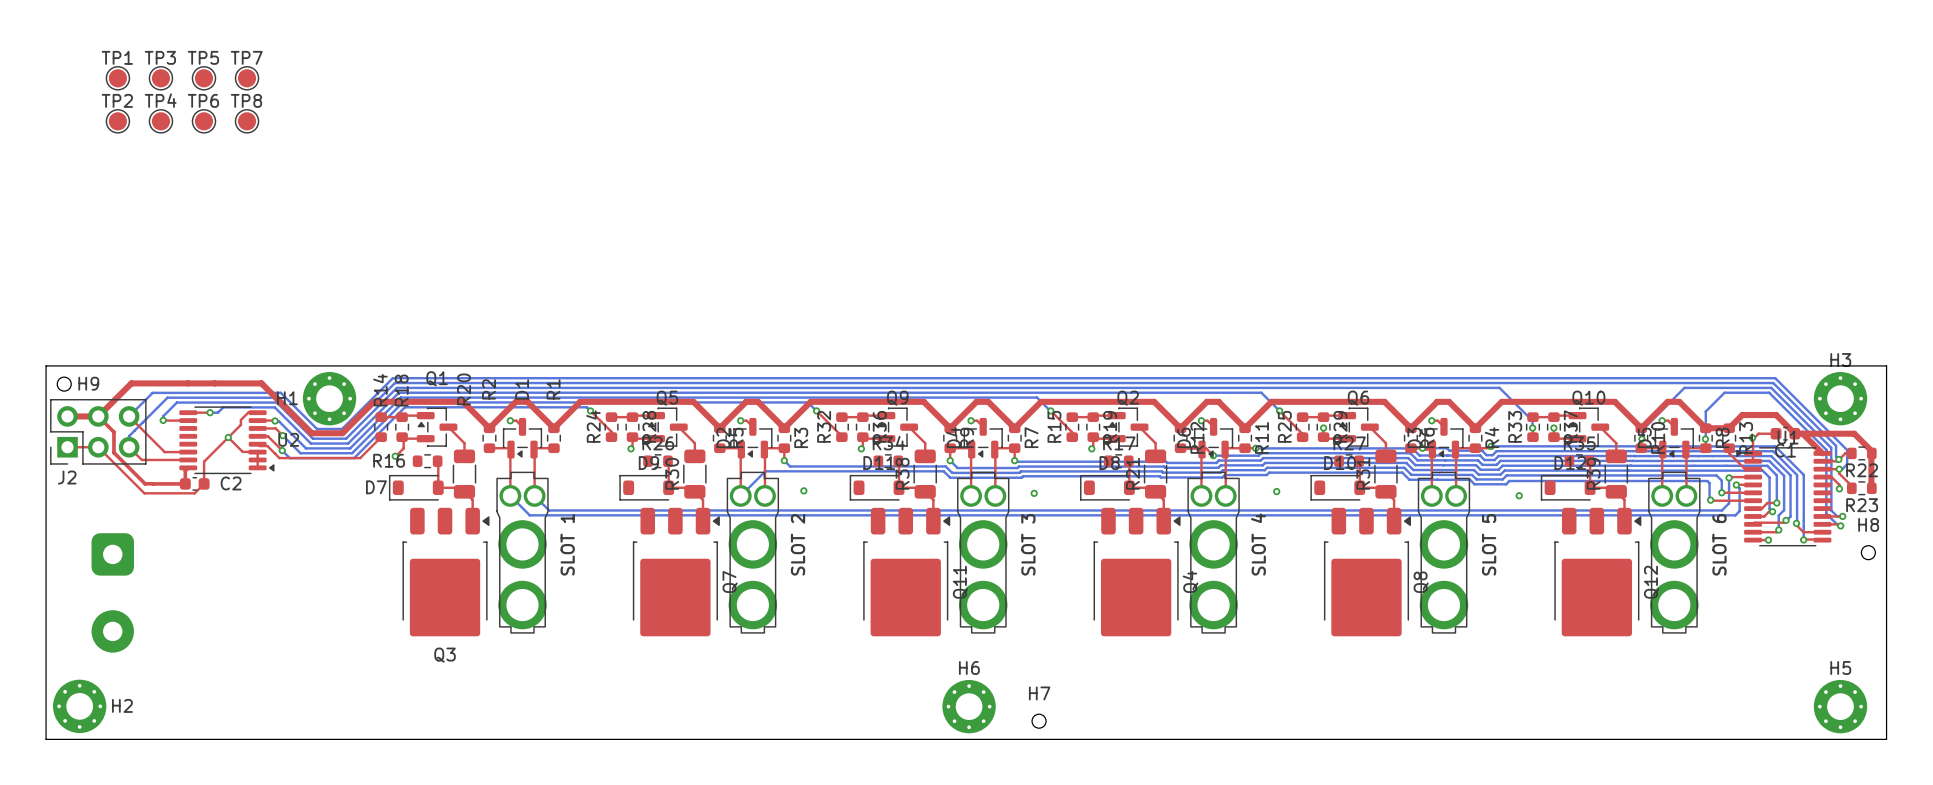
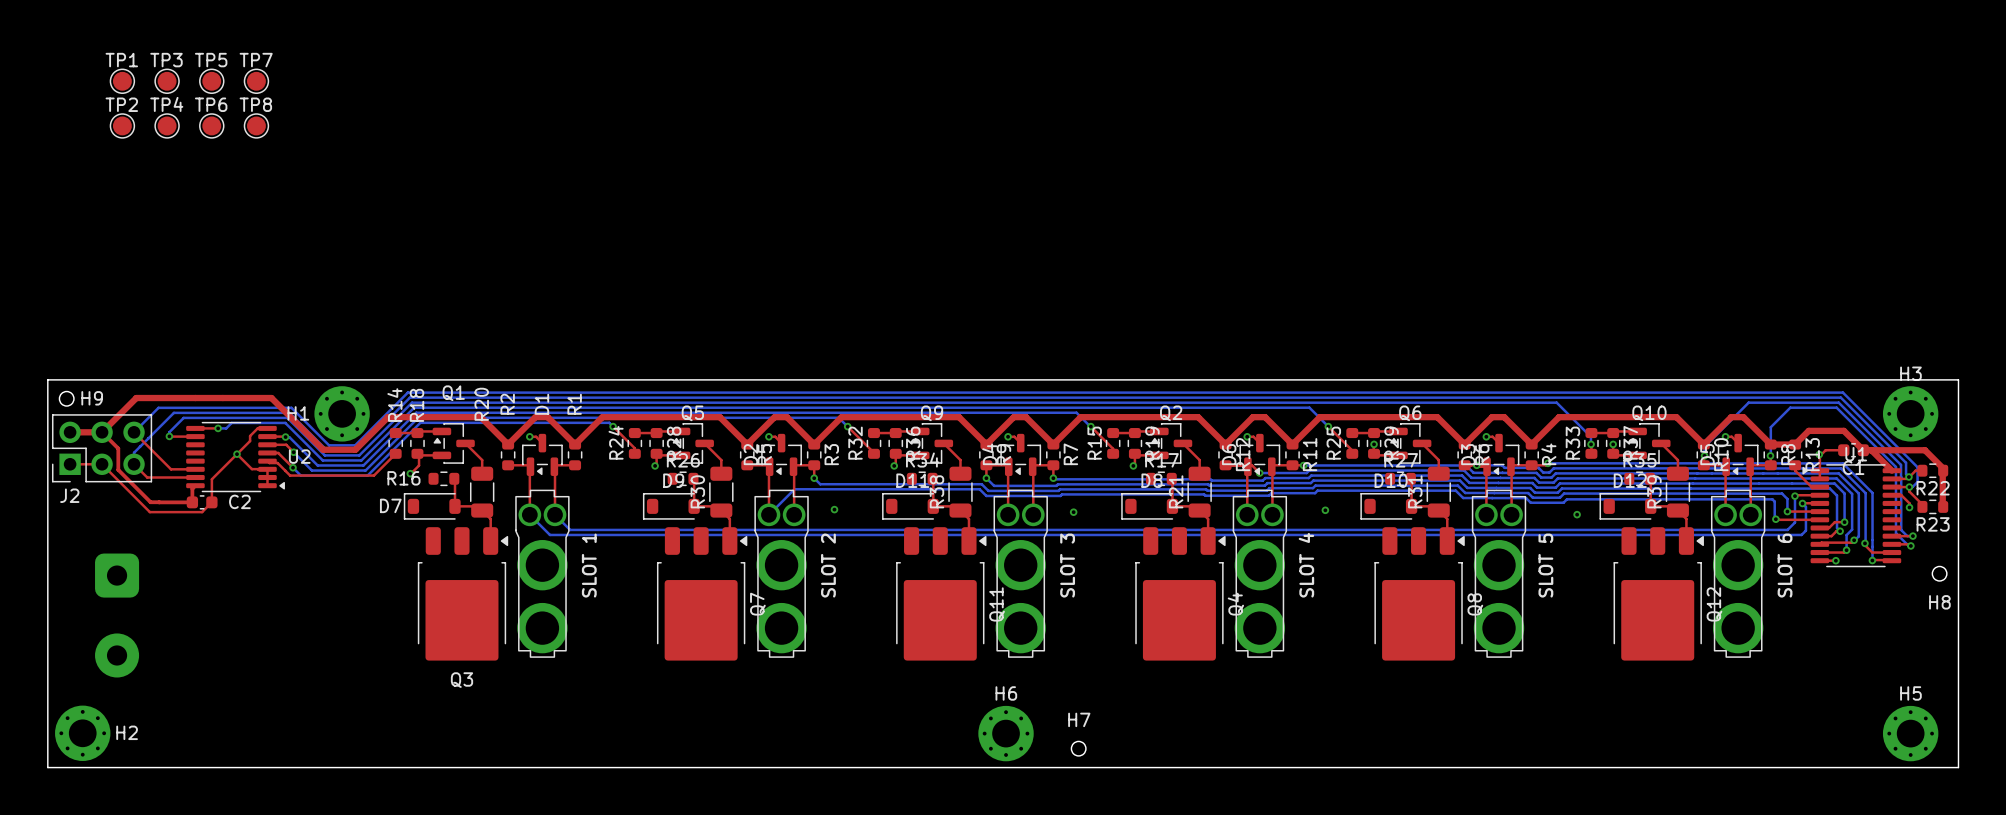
H8 name position: H8 (1868, 524) -> H8 (1939, 602)

